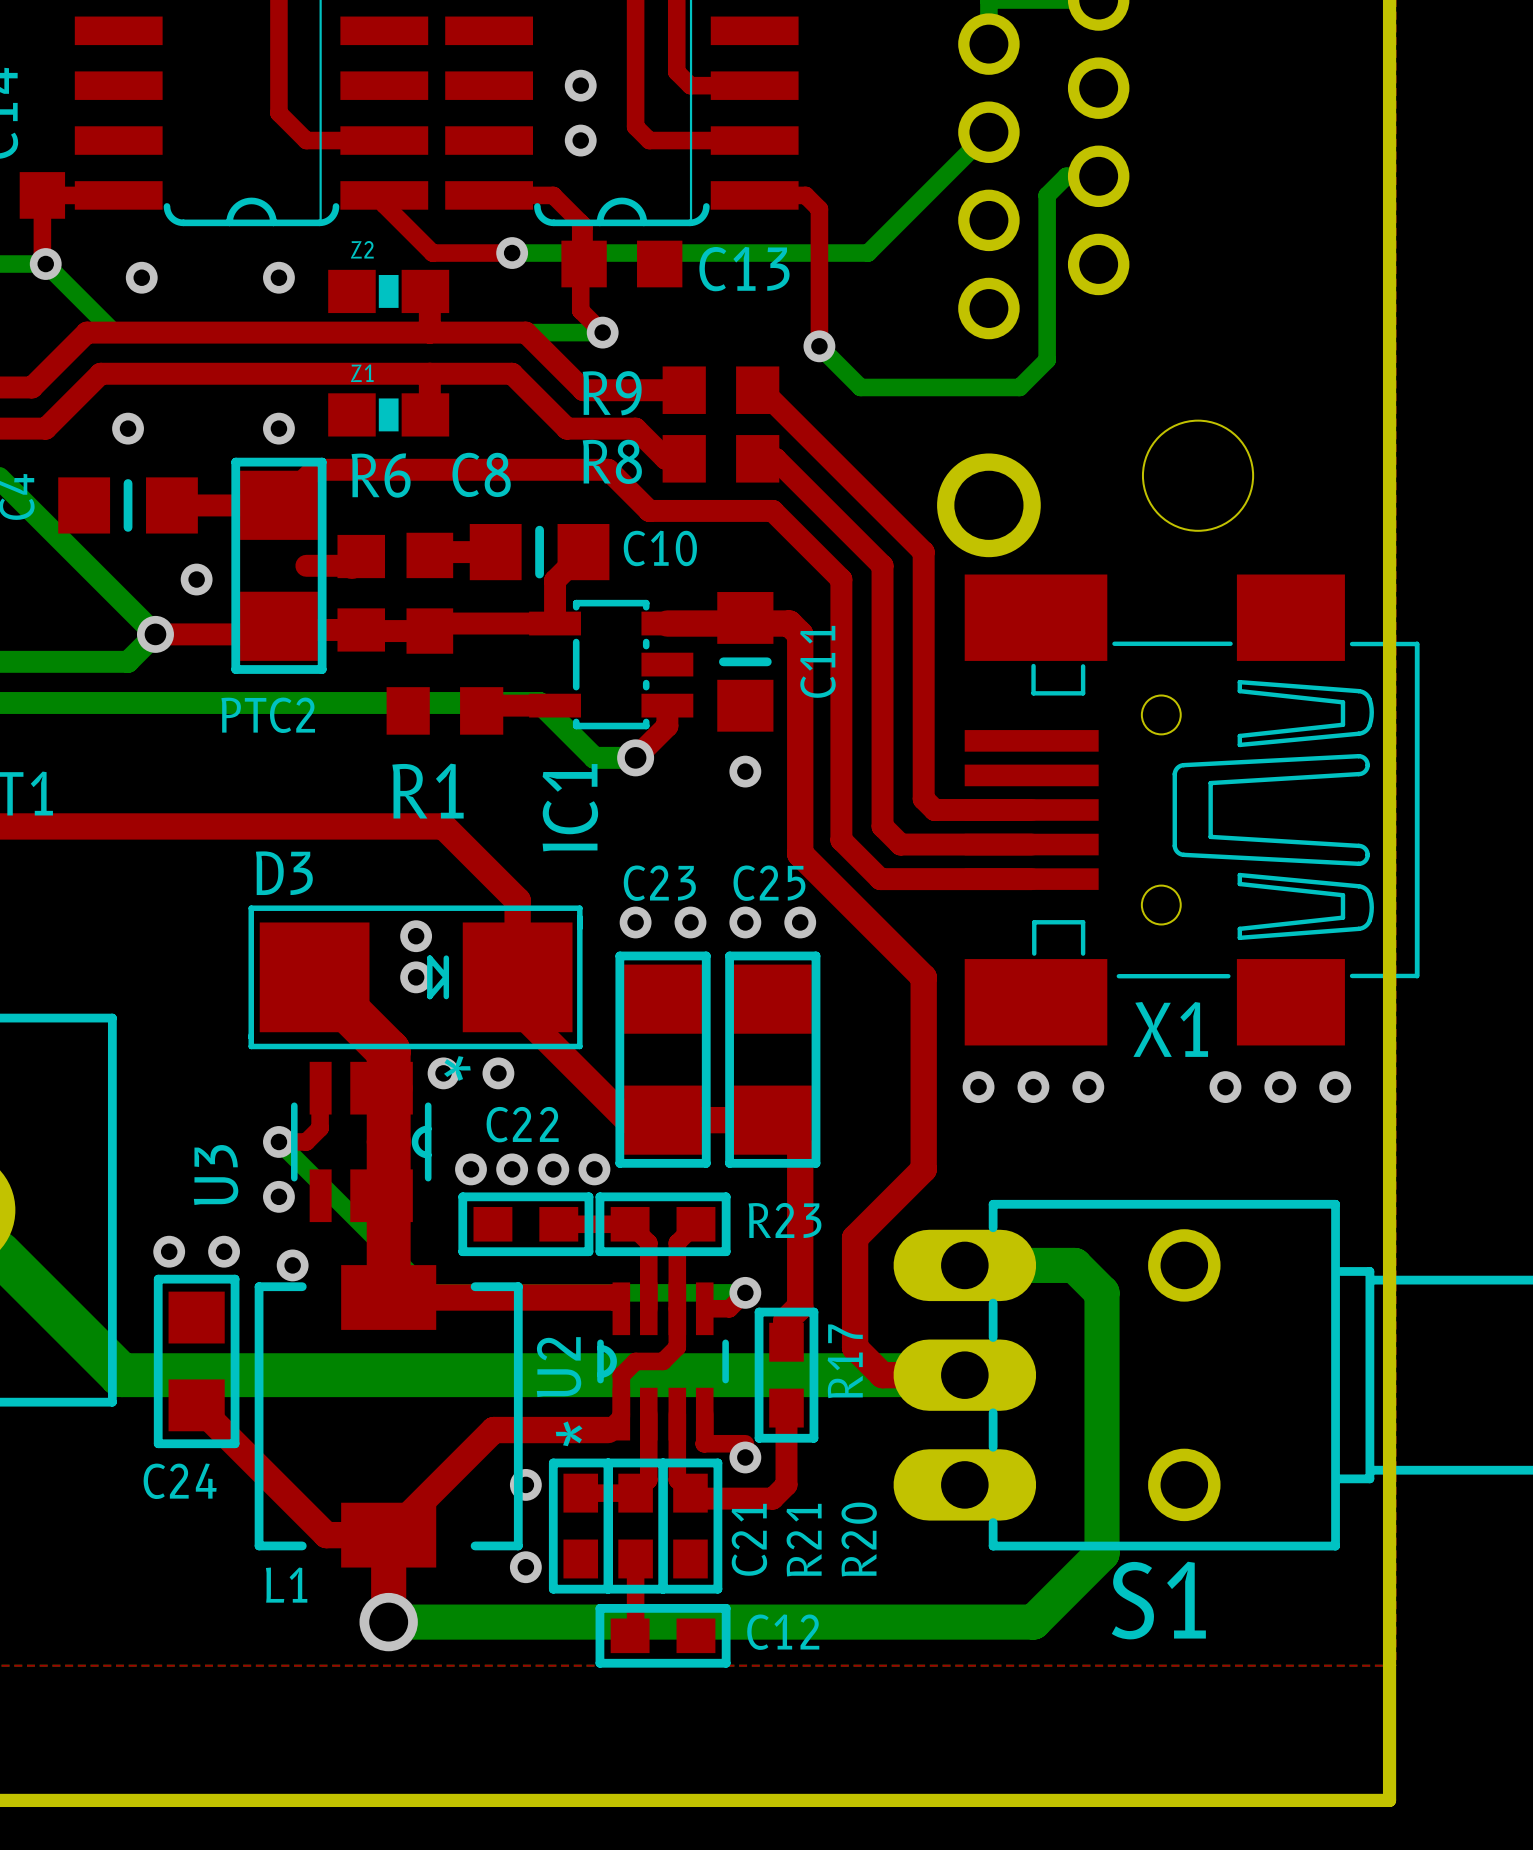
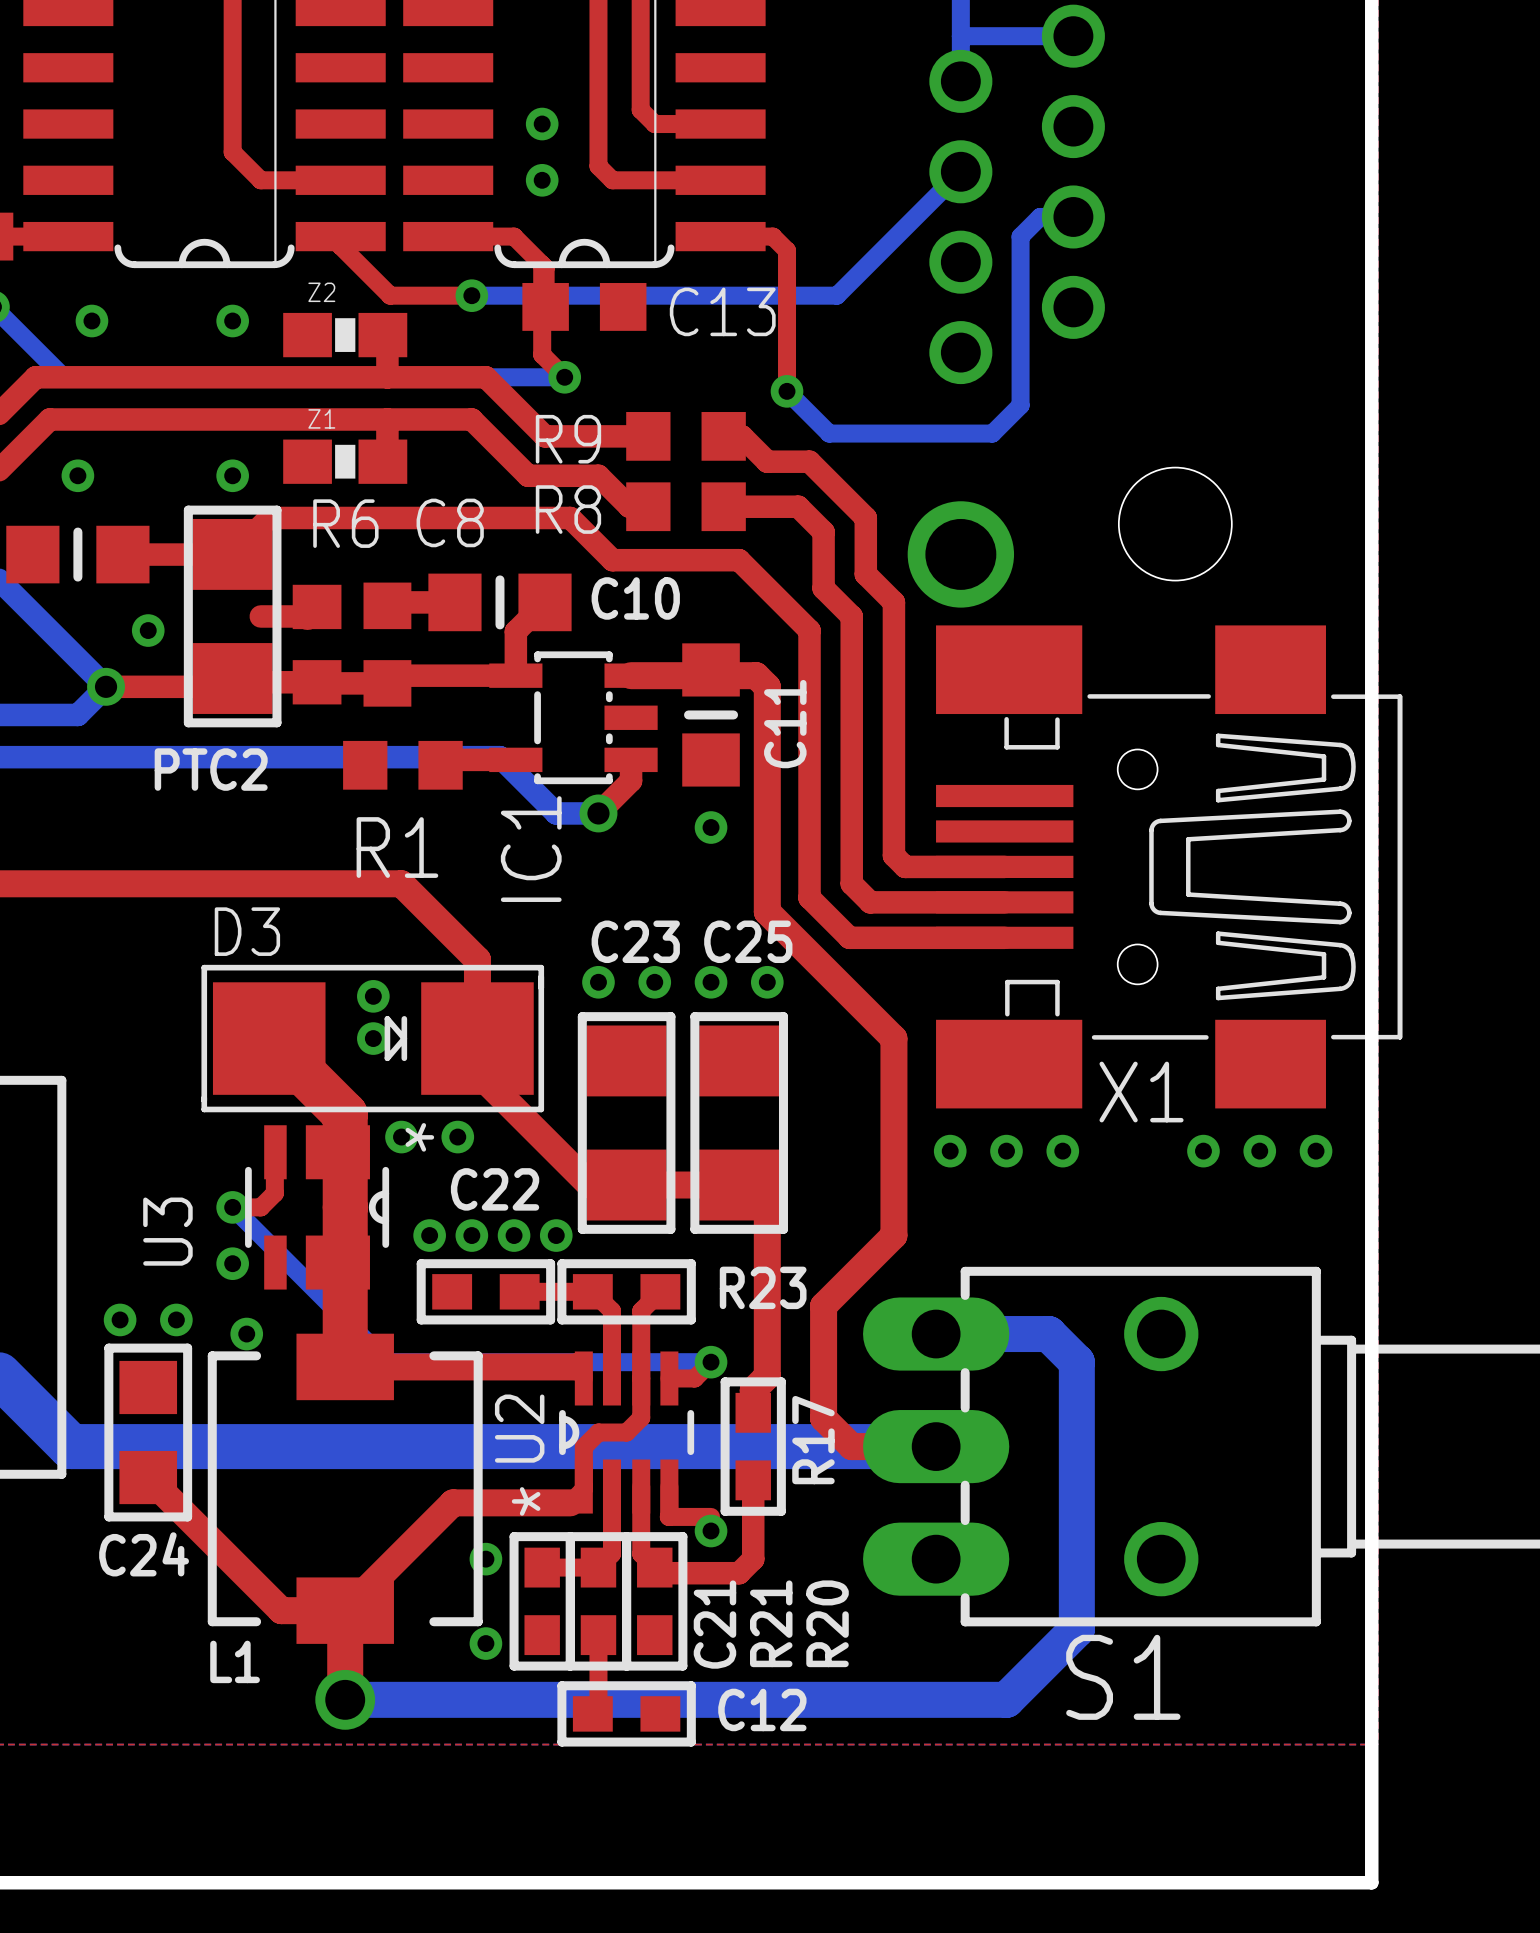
top track: (757, 390) (748, 390) (759, 387) (830, 458) -> (741, 506) (798, 506)
top track: none -> (723, 436) (741, 436) (767, 461) (809, 461) (865, 517) (865, 574)
top track: (775, 458) (855, 538) -> none
top track: (855, 483) (896, 524) -> (823, 532) (823, 588)

